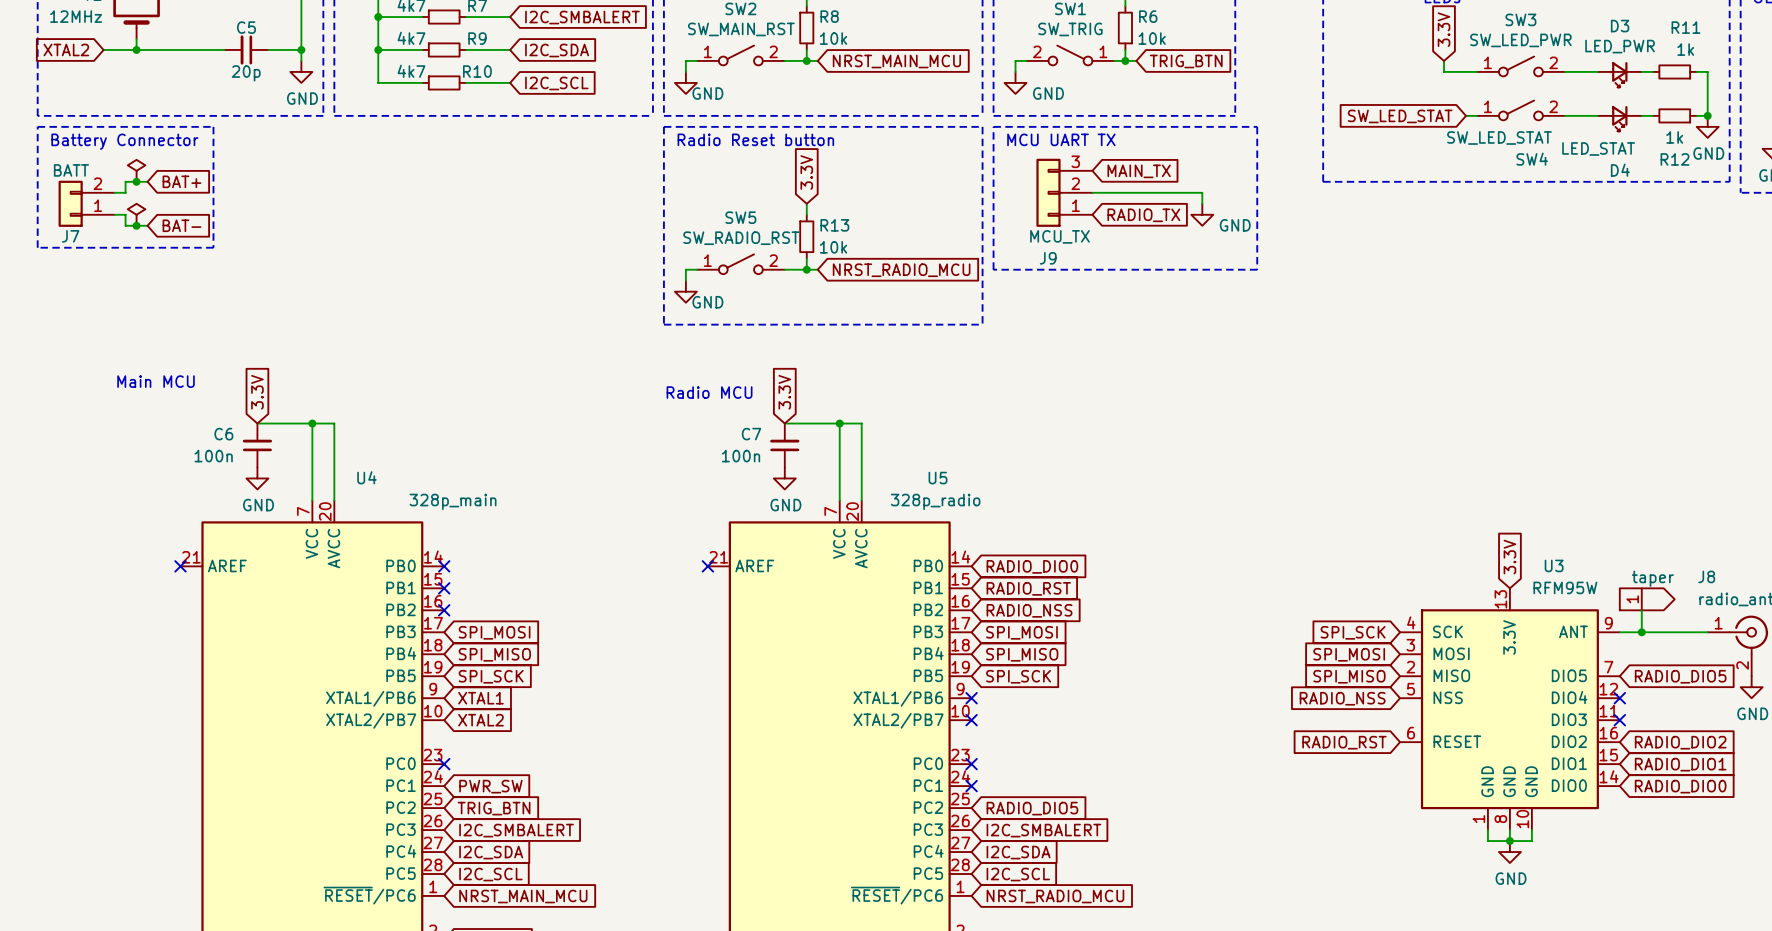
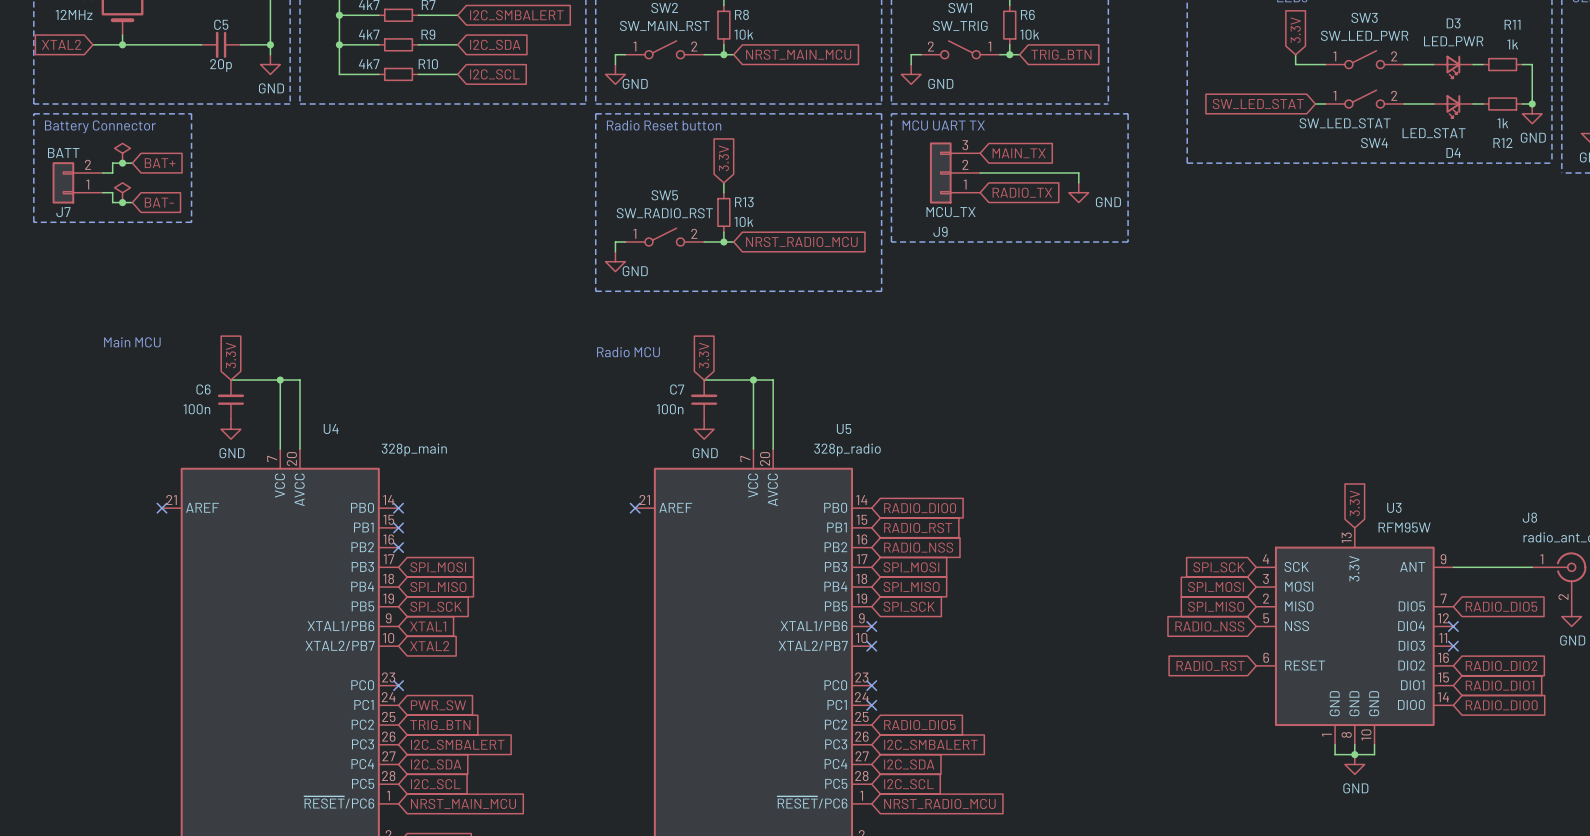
part: taper (1647, 599) -> none
wire: (1641, 610) (1641, 632) -> none
junction: (1641, 632) -> none

